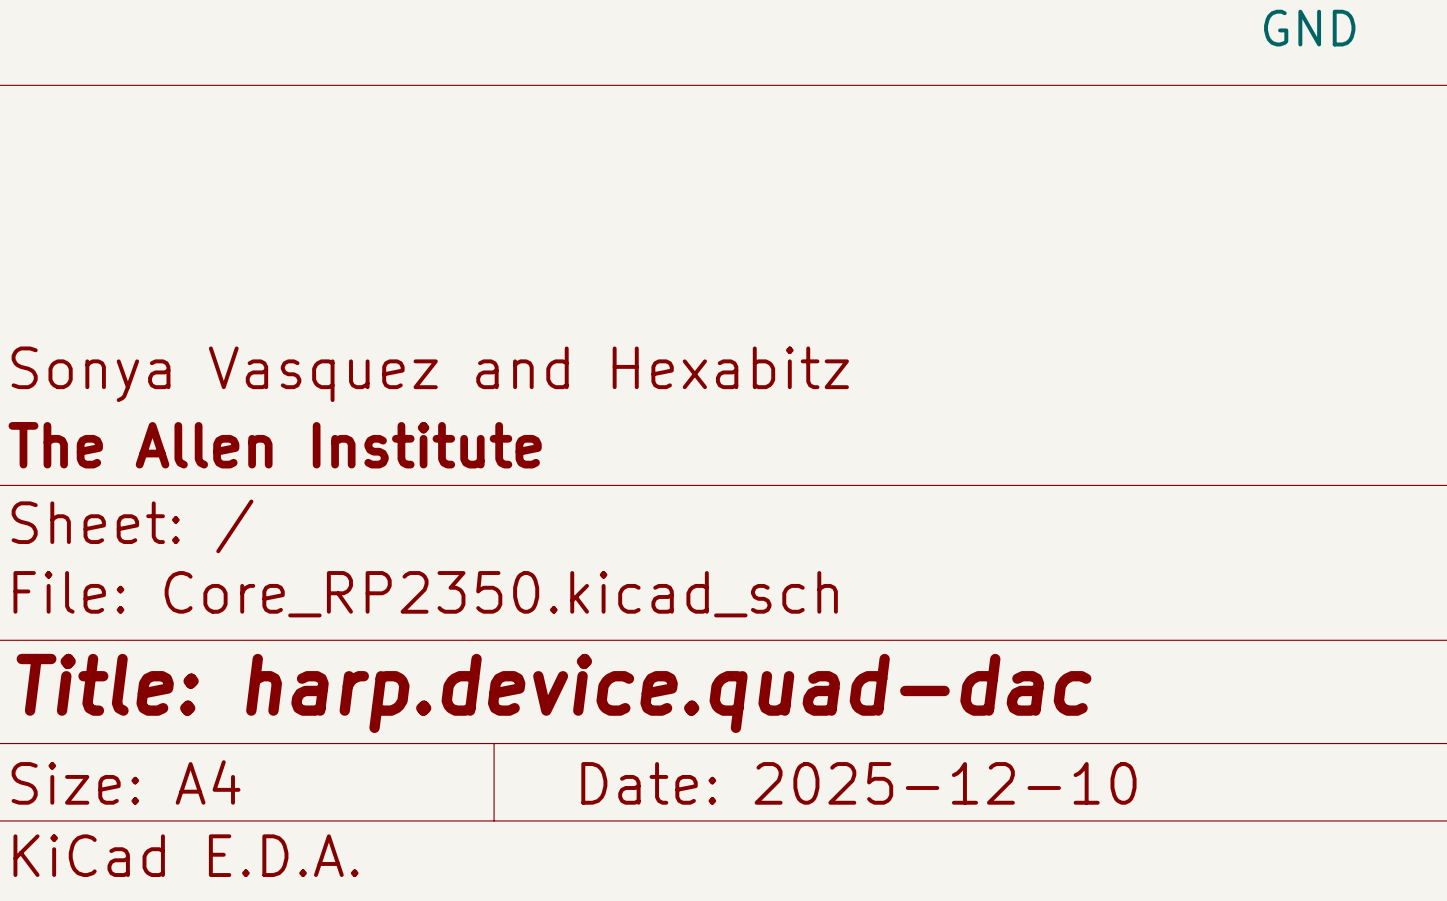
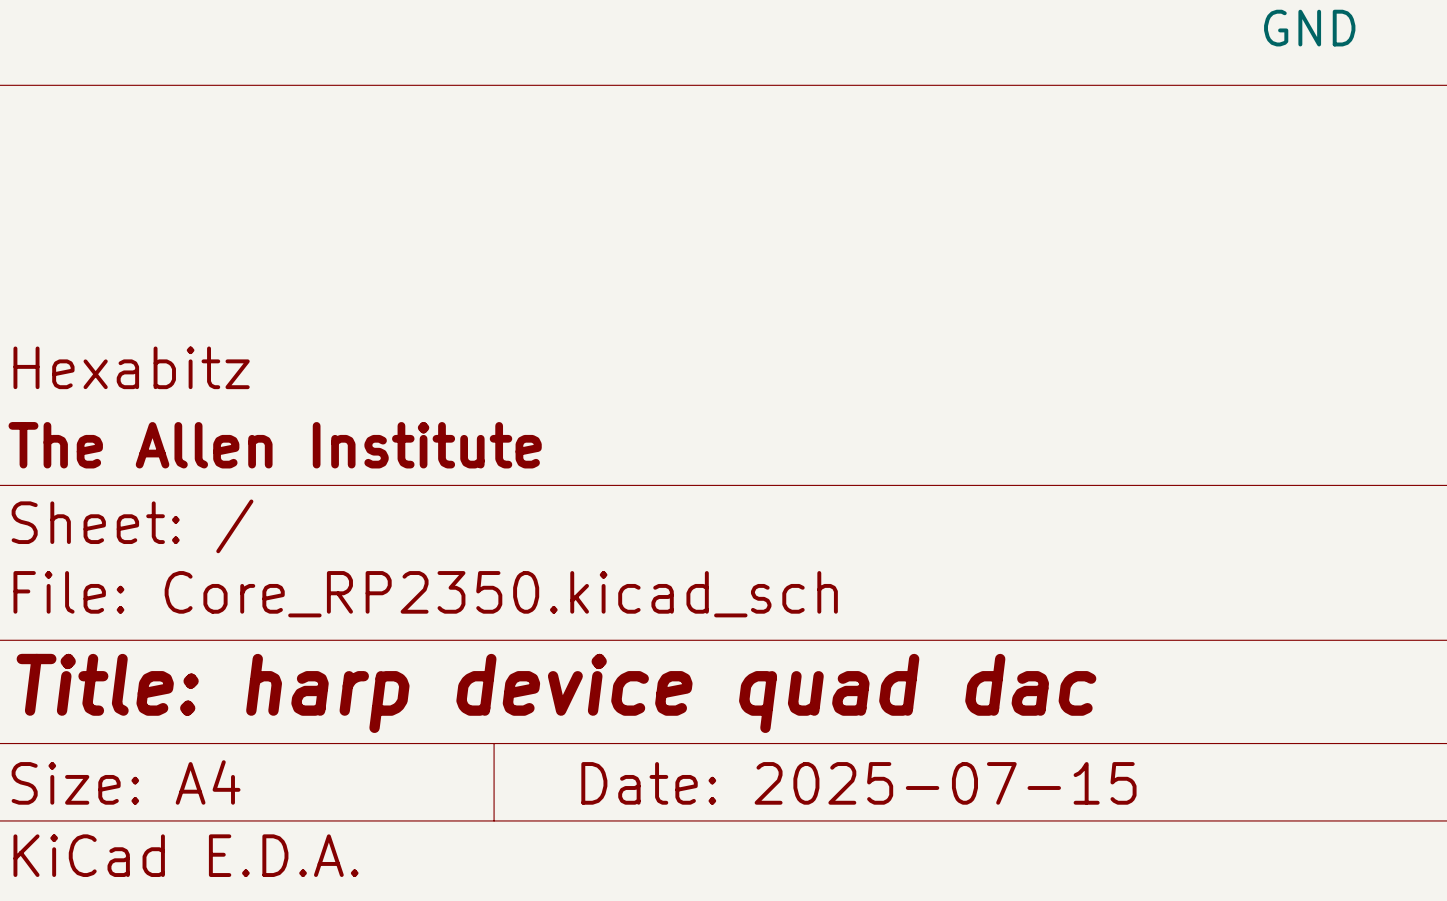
title block: Sonya Vasquez and Hexabitz (430, 374) -> Hexabitz (131, 367)
title block: Title: harp.device.quad-dac (554, 693) -> Title: harp device quad dac (556, 693)
title block: Date: 2025-12-10 (858, 783) -> Date: 2025-07-15 (858, 783)

